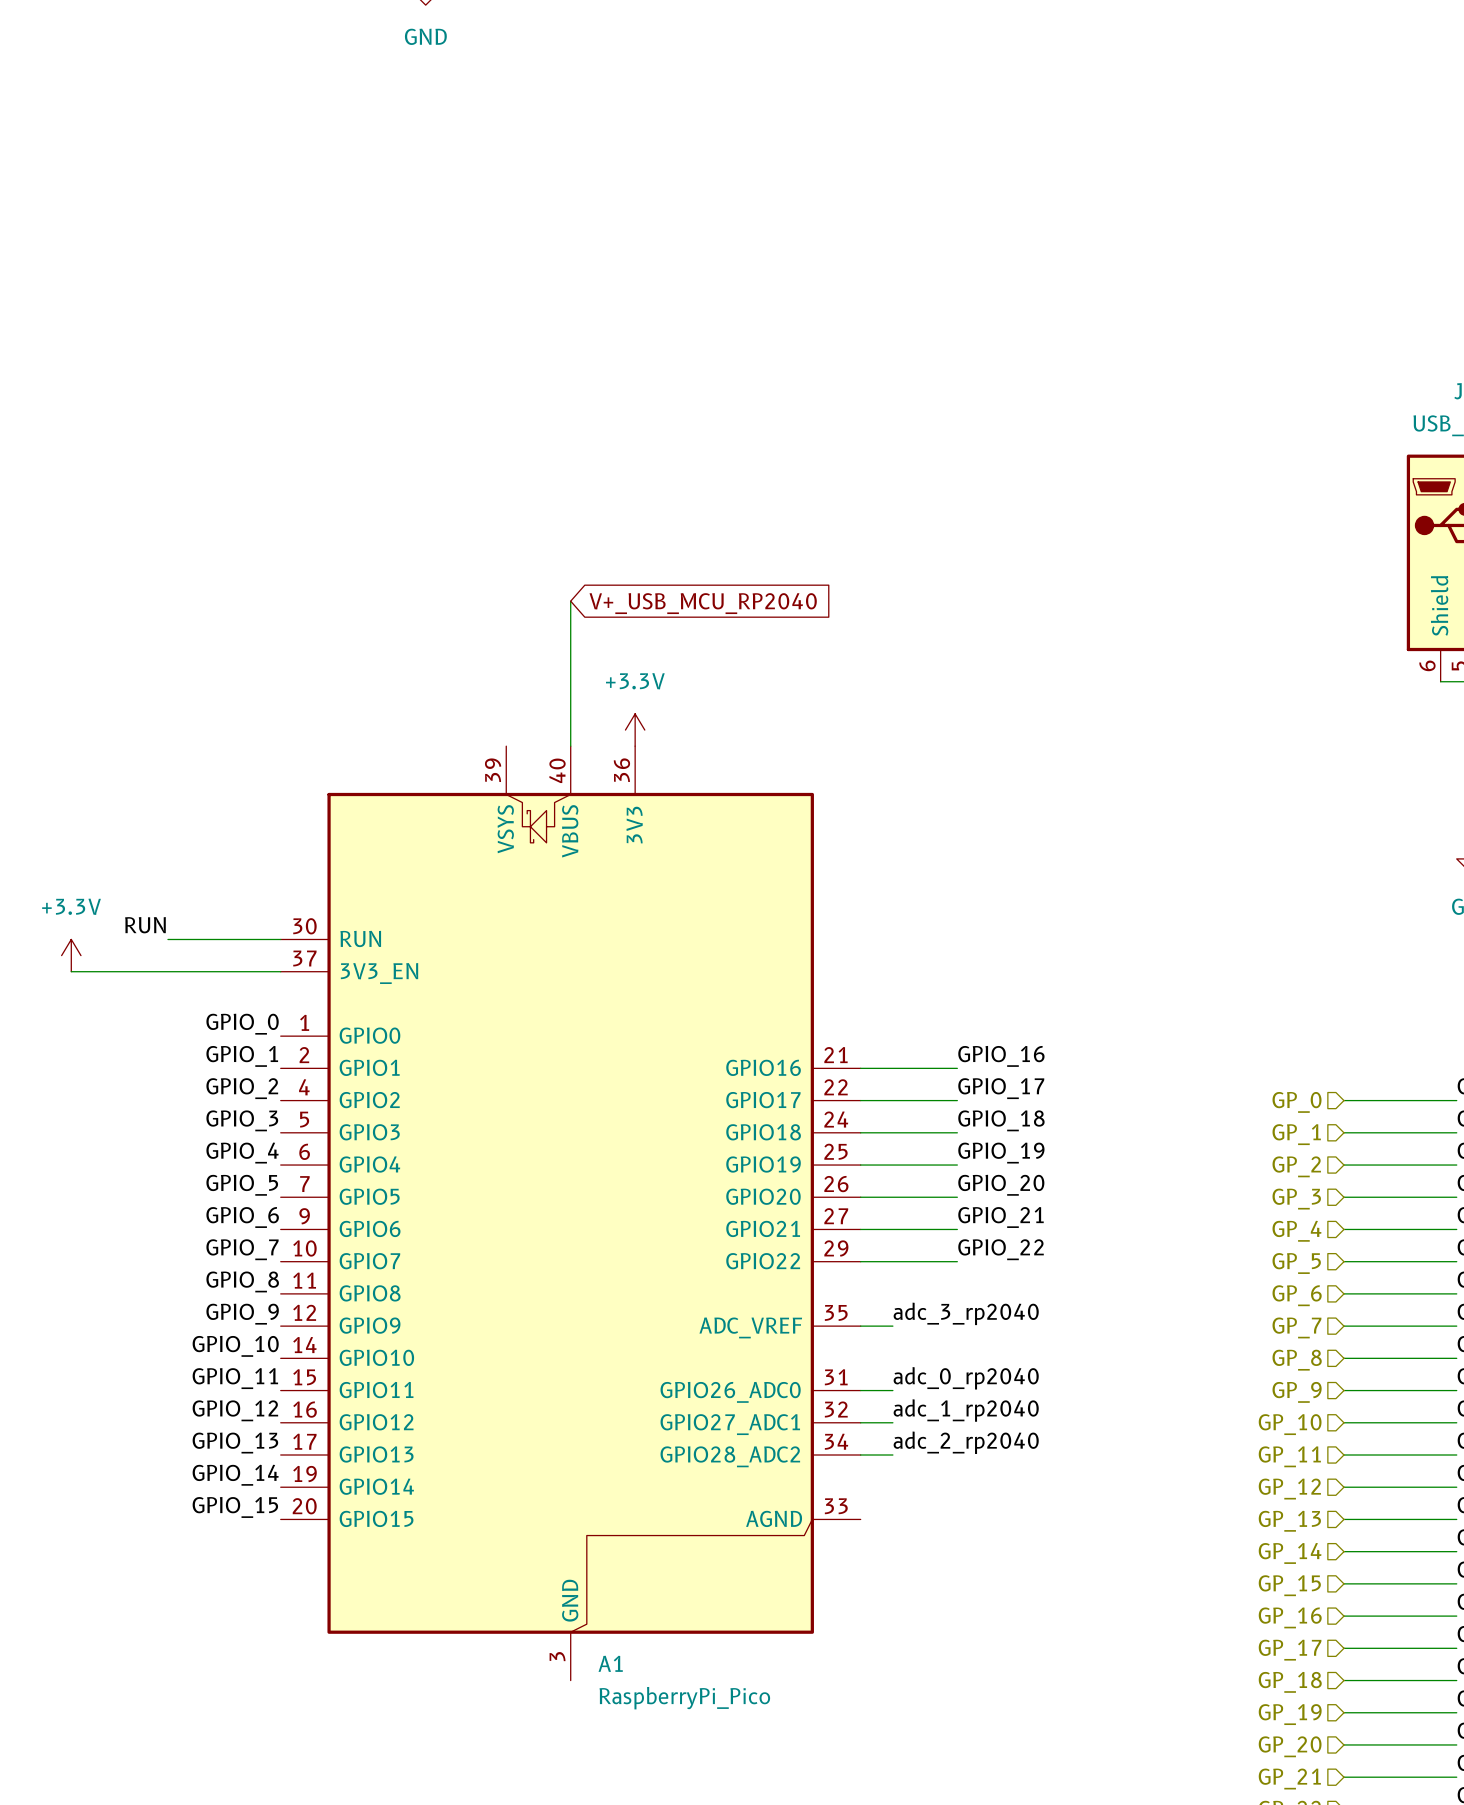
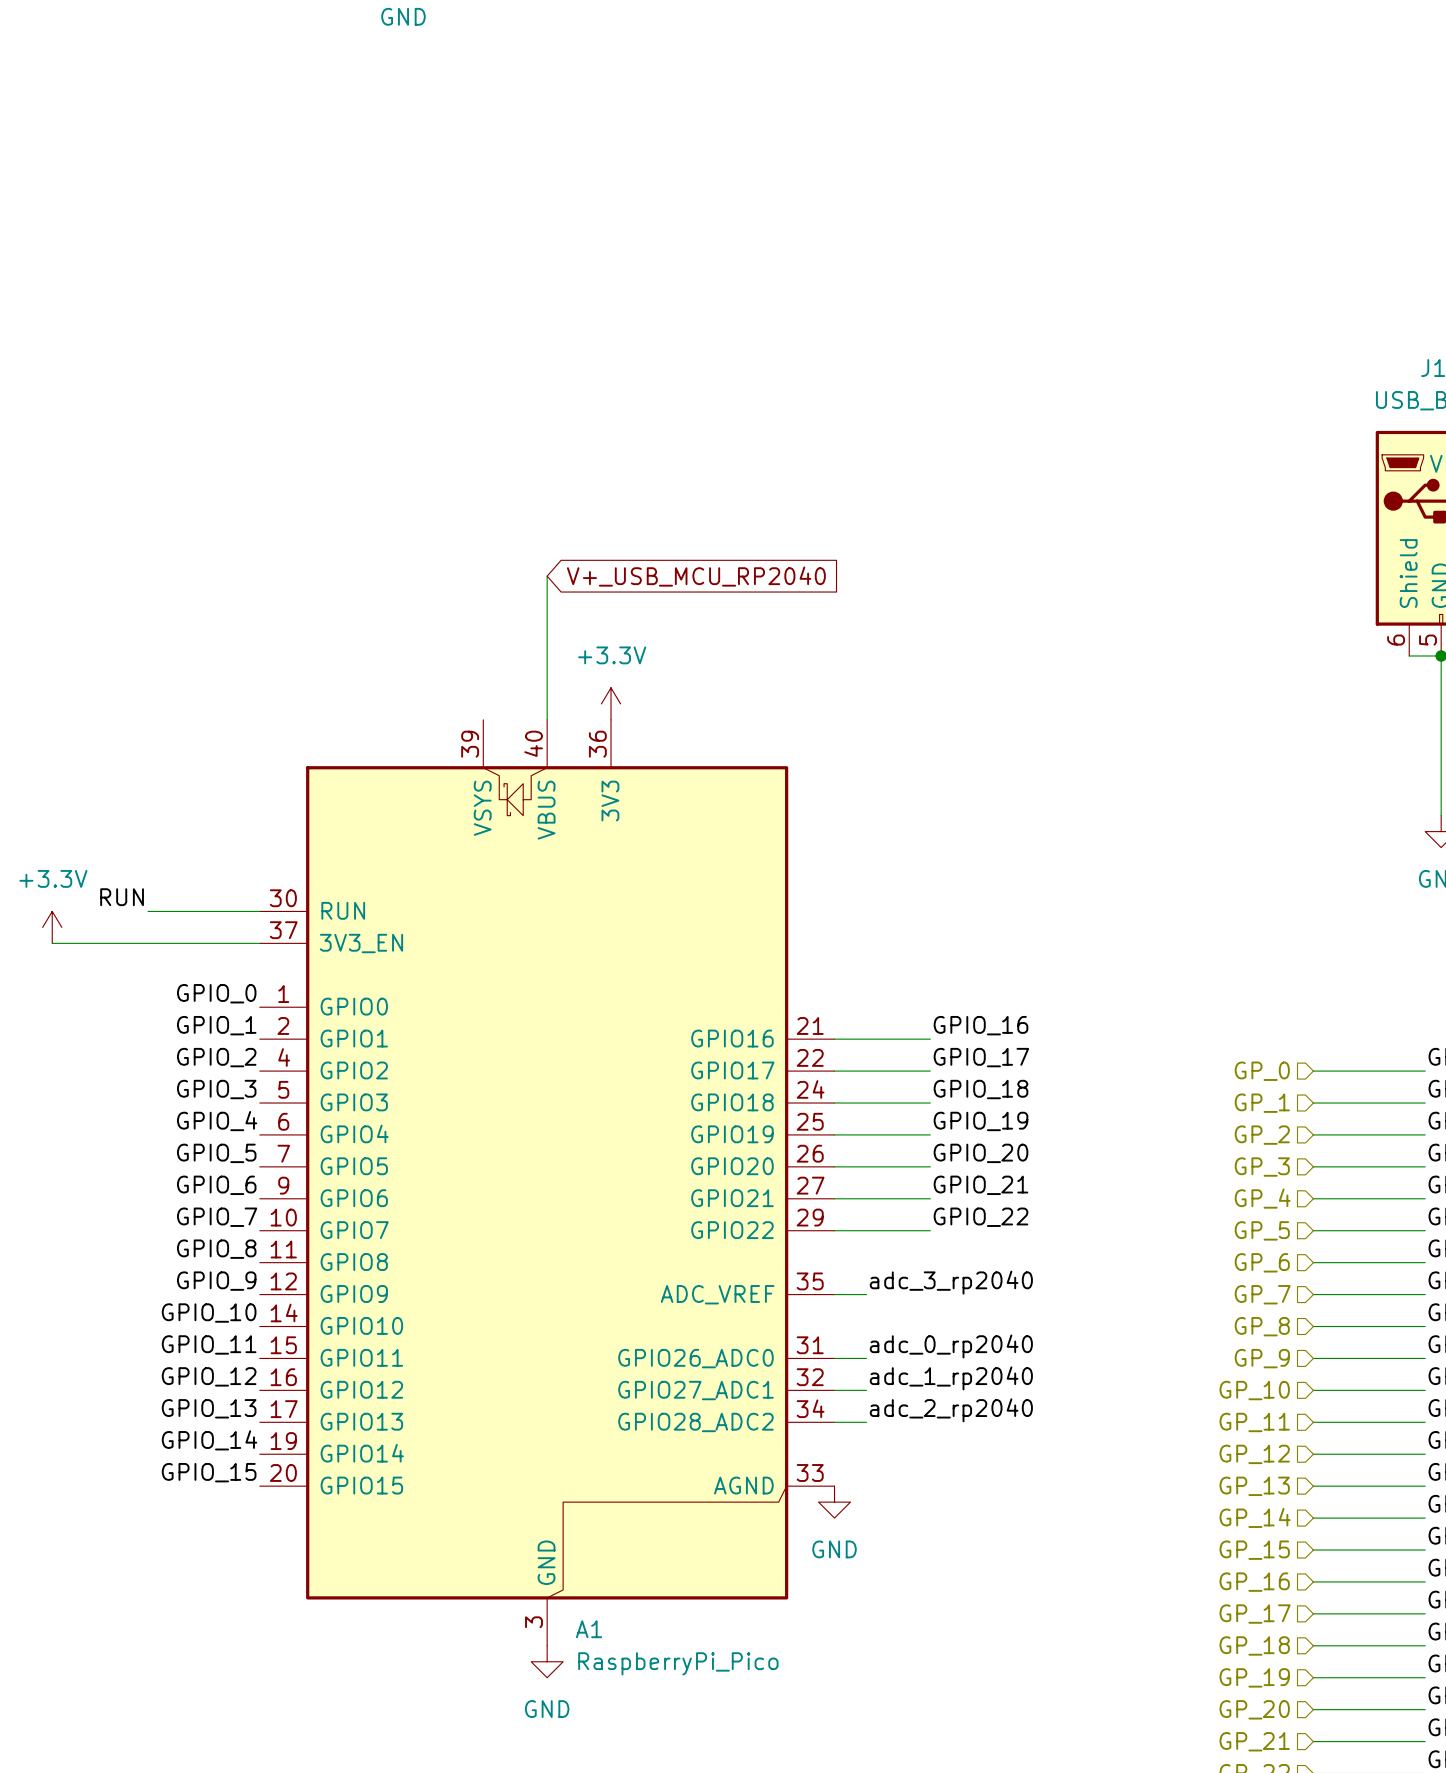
power symbol: none -> GND (834, 1502)
power symbol: none -> GND (547, 1661)

